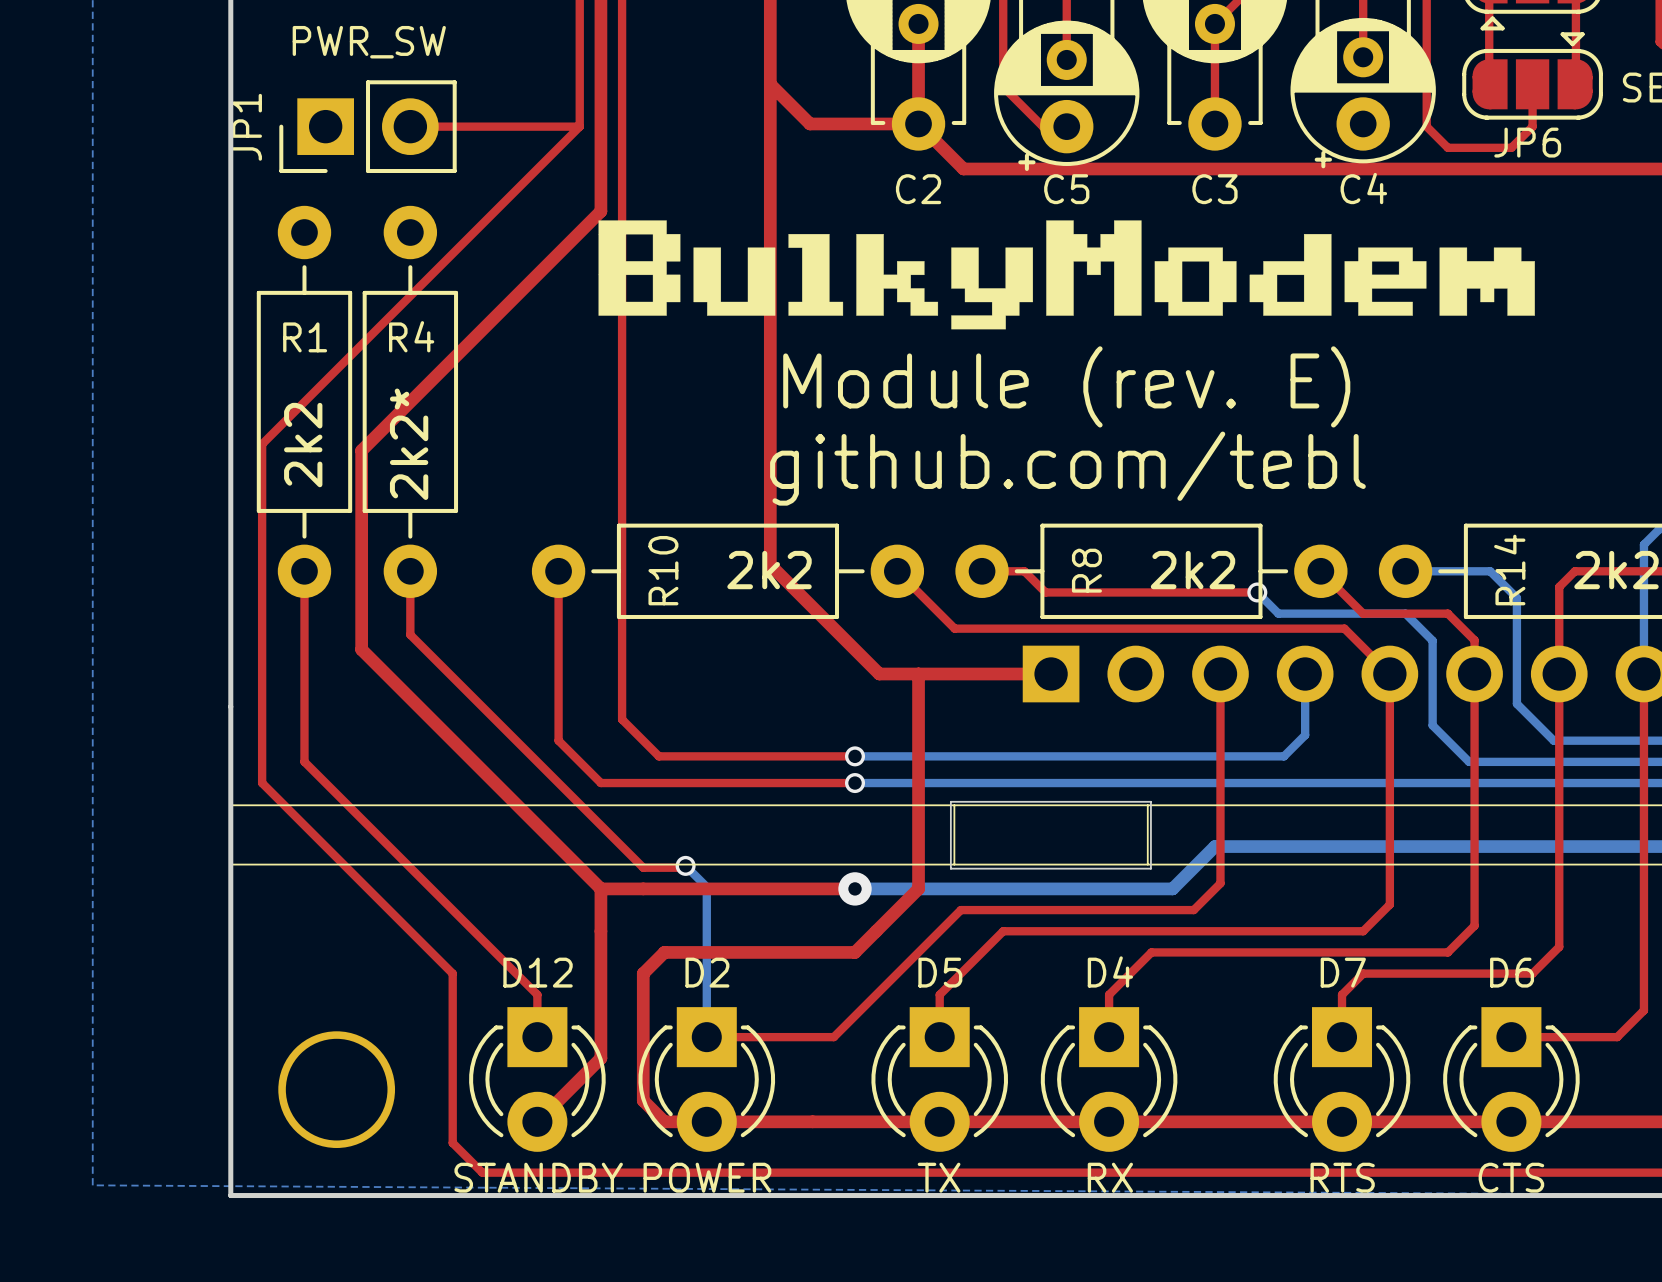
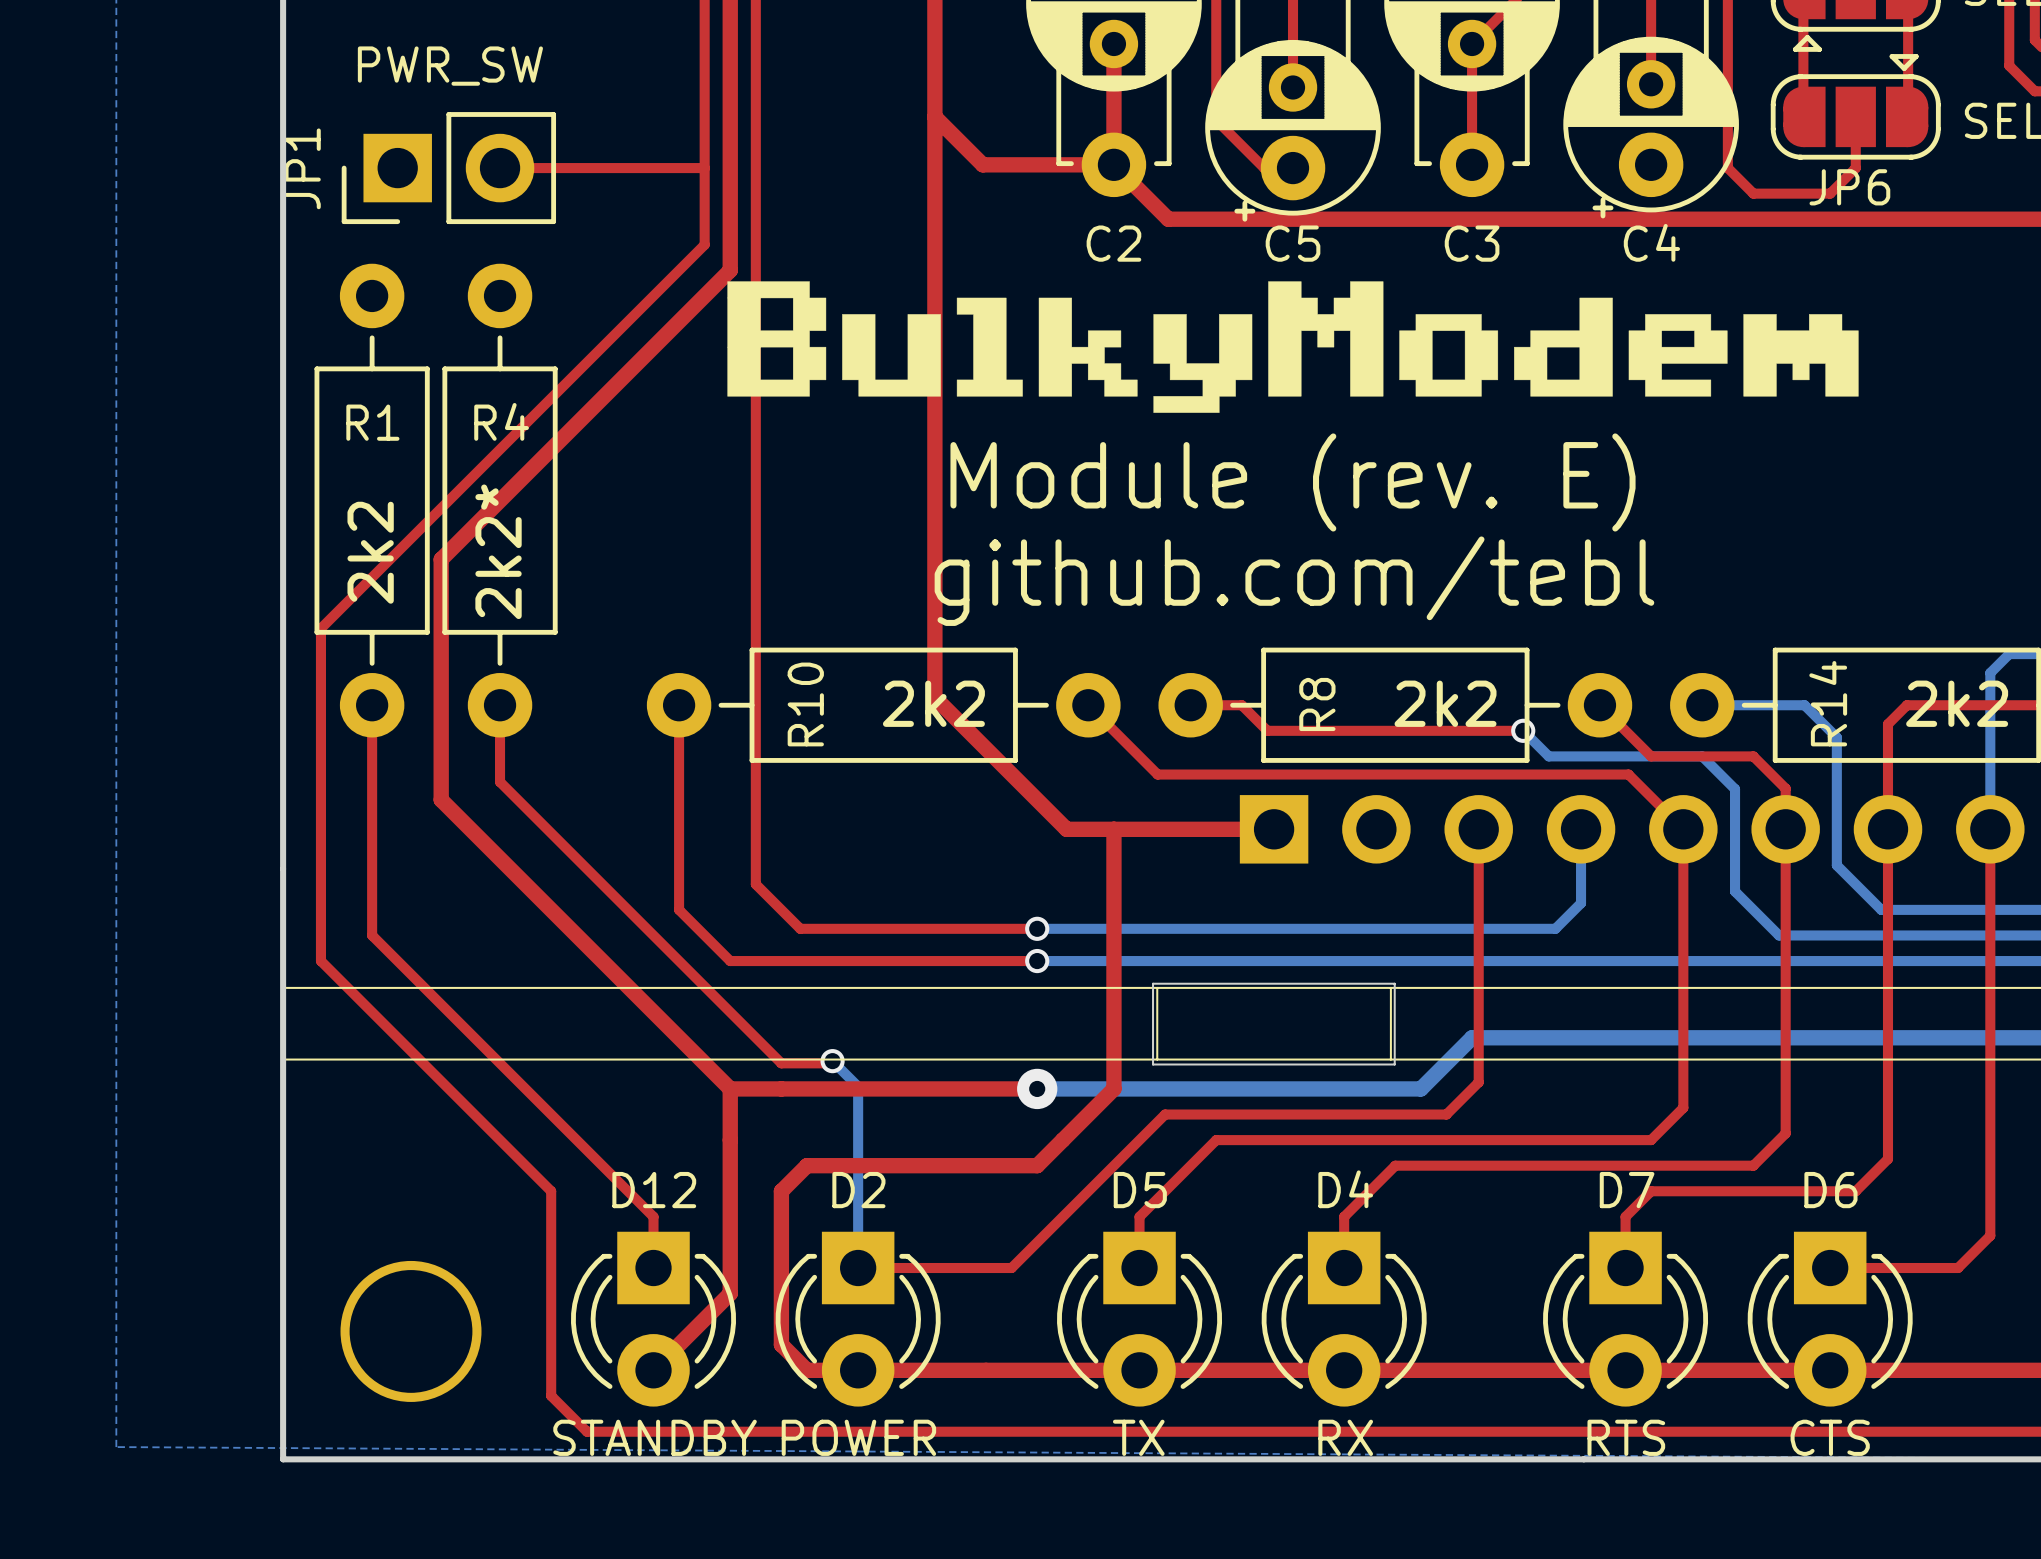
top track: (579, 126) (262, 444) (262, 507) -> (704, 168) (704, 244) (320, 628)

